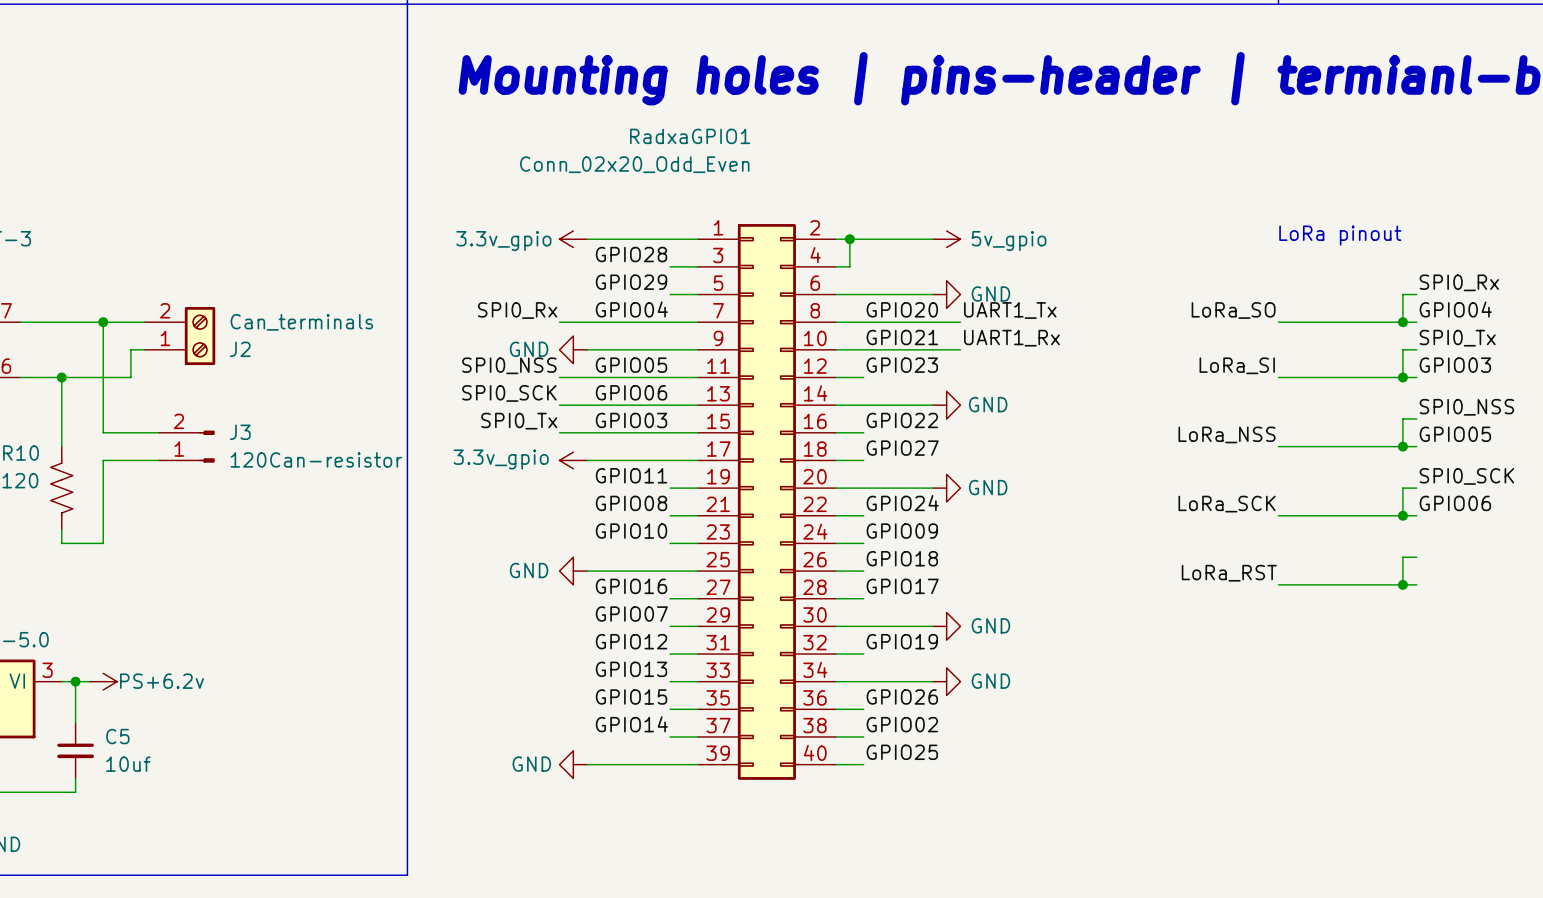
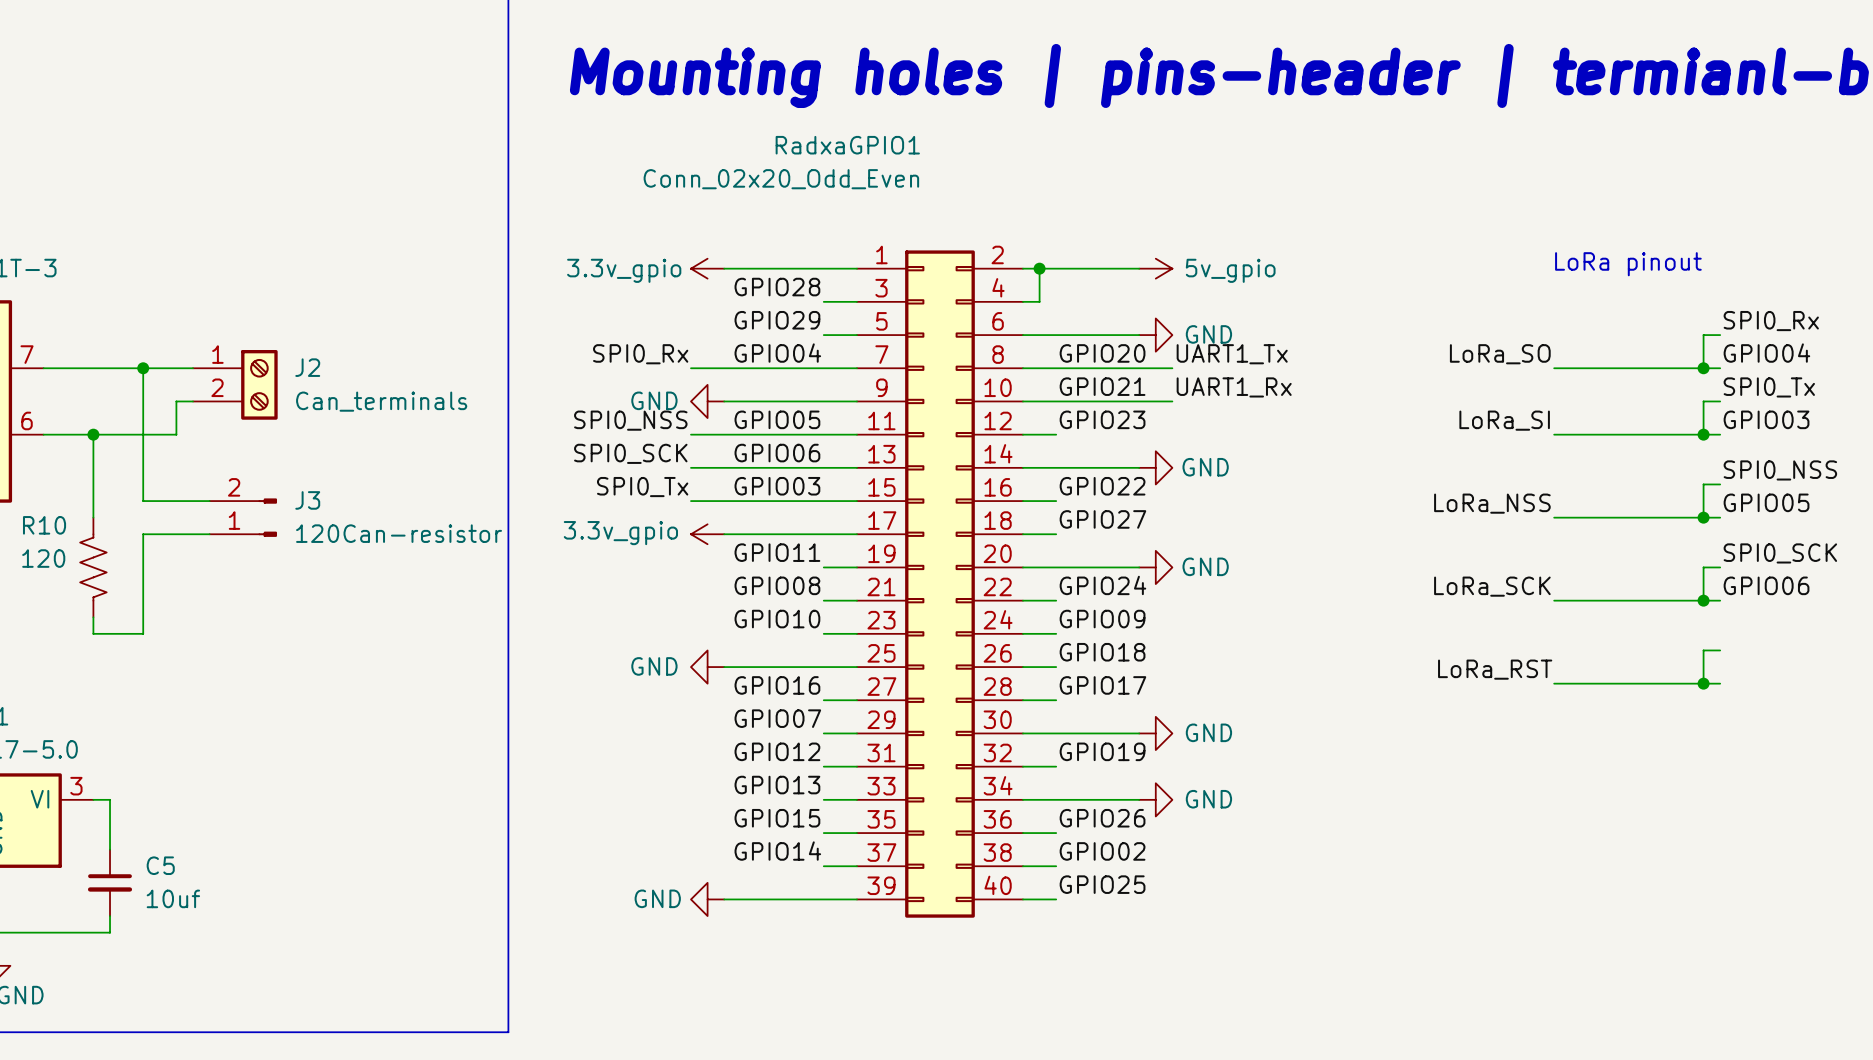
J2 flip: as is (200, 336) -> up-down (259, 384)
wire: (75, 681) (89, 681) -> none
junction: (75, 681) -> none
power symbol: PS+6.2v (103, 681) -> none

